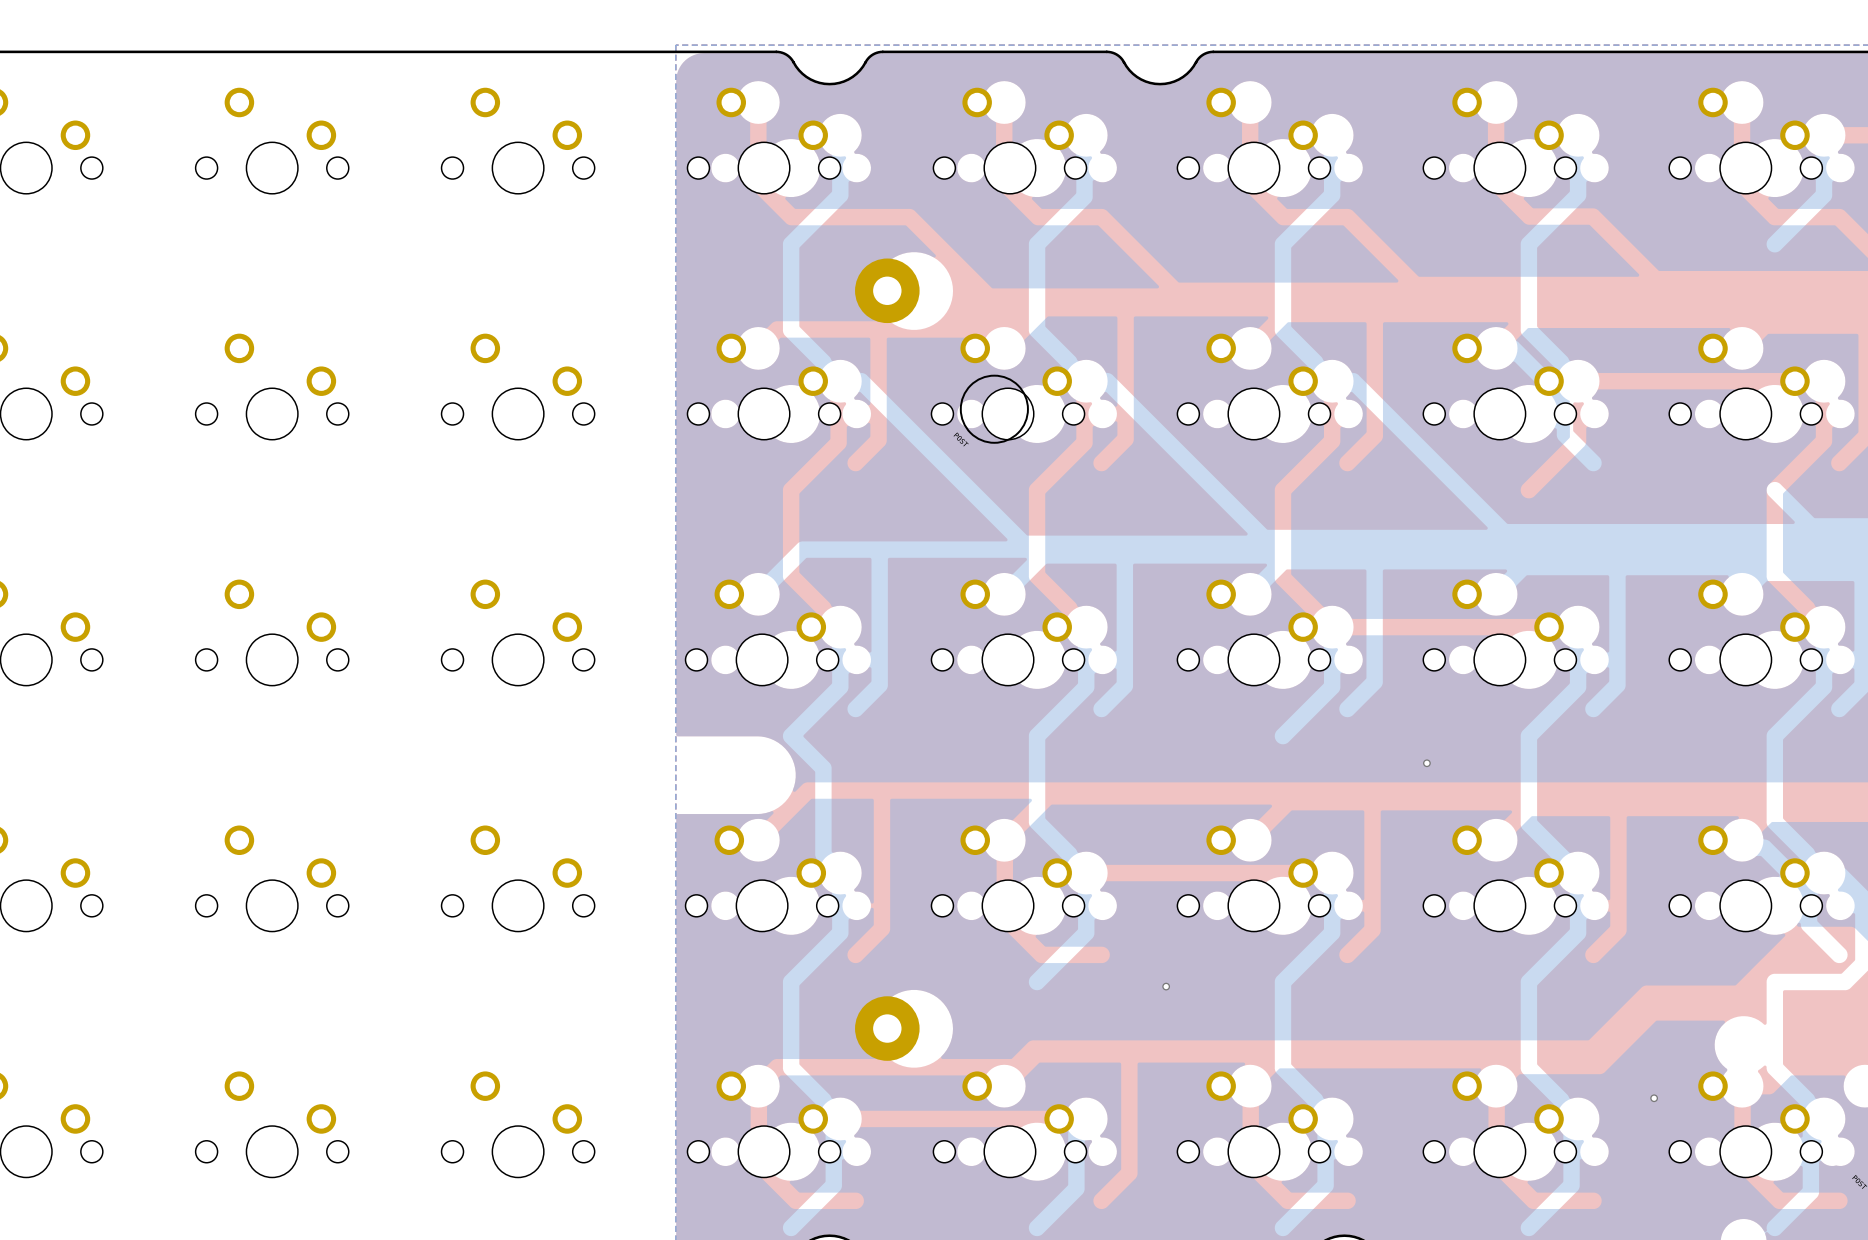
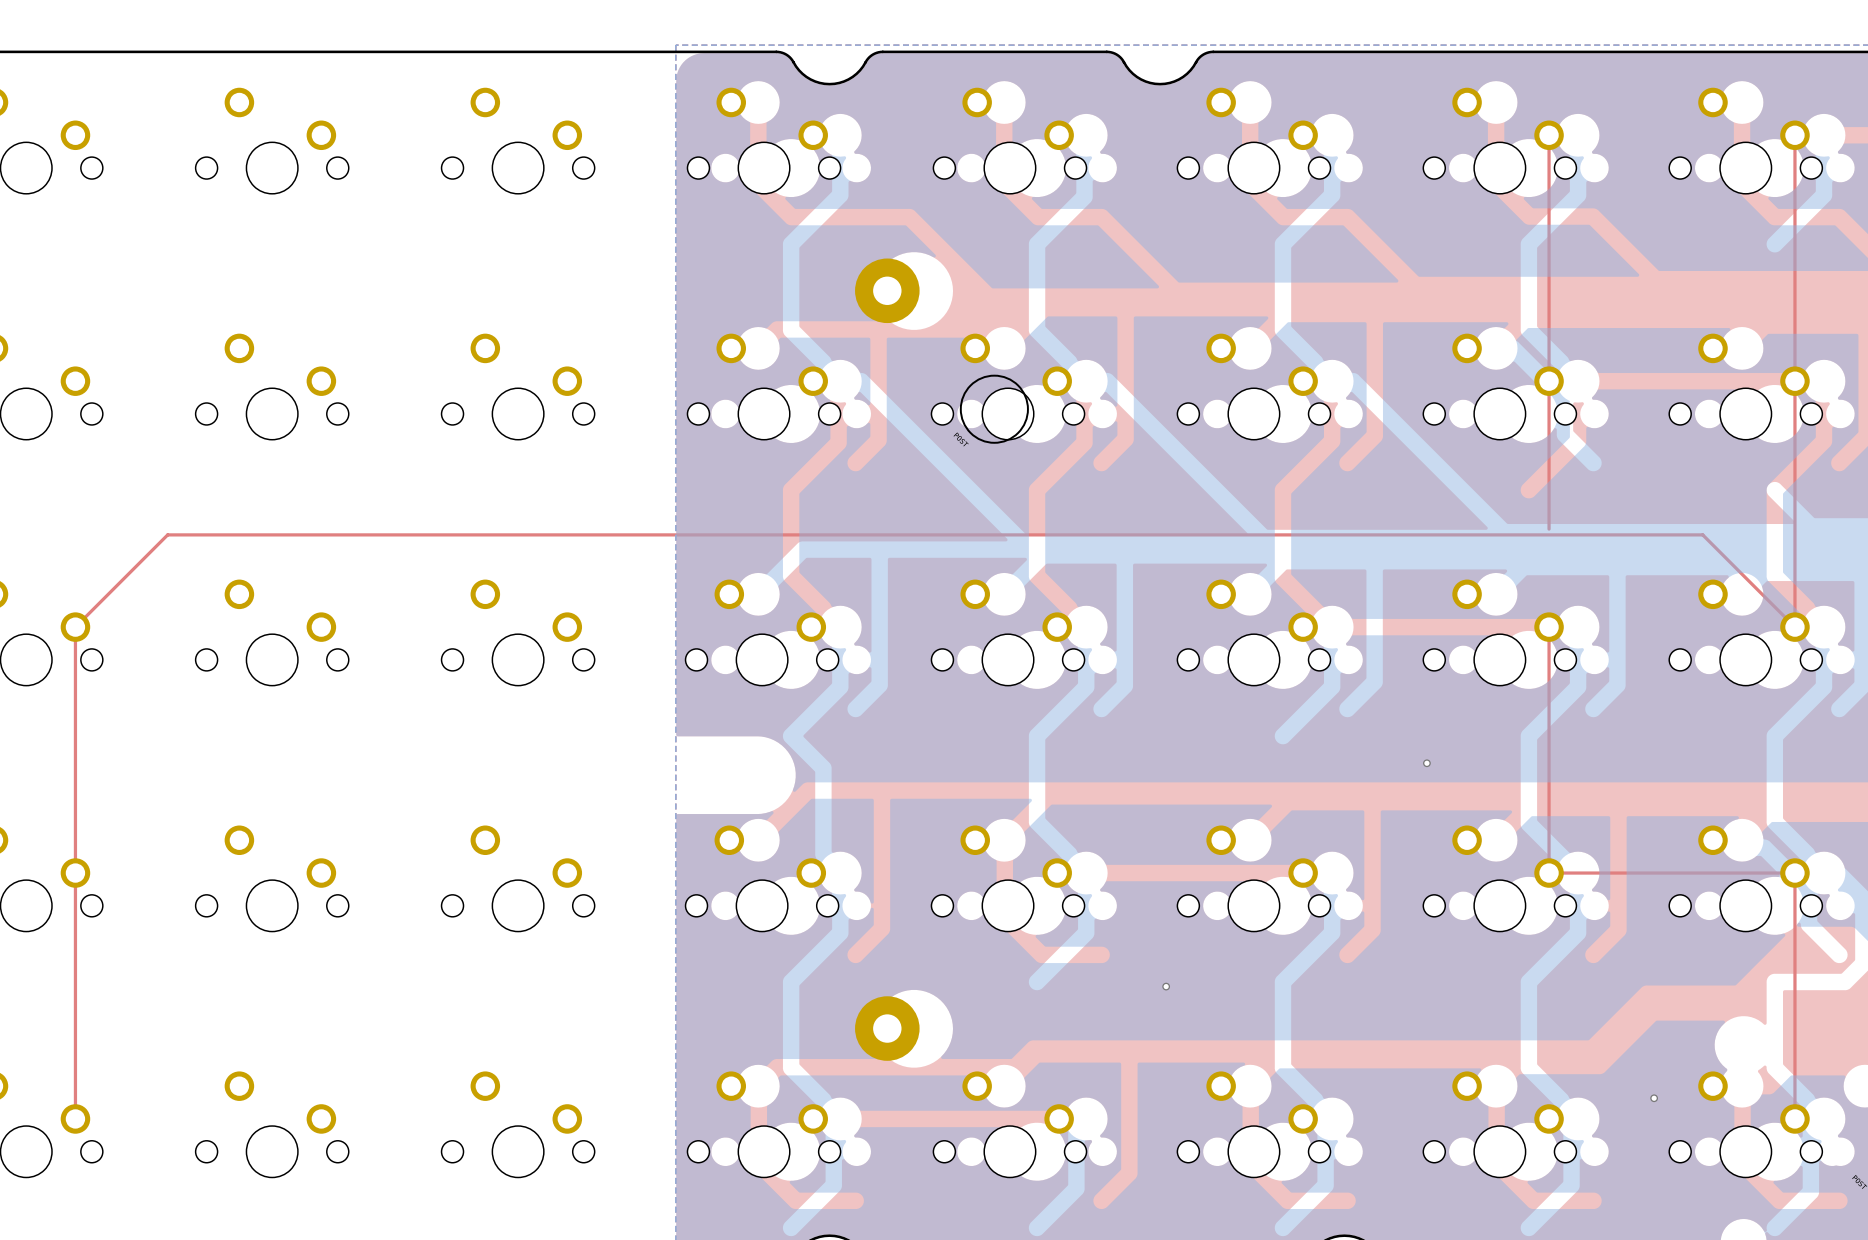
top track: none -> (1549, 135) (1549, 529)
top track: none -> (1794, 135) (1794, 627) (1702, 534) (167, 534) (75, 627) (75, 1118)
top track: none -> (1549, 627) (1549, 873) (1794, 873) (1794, 1118)

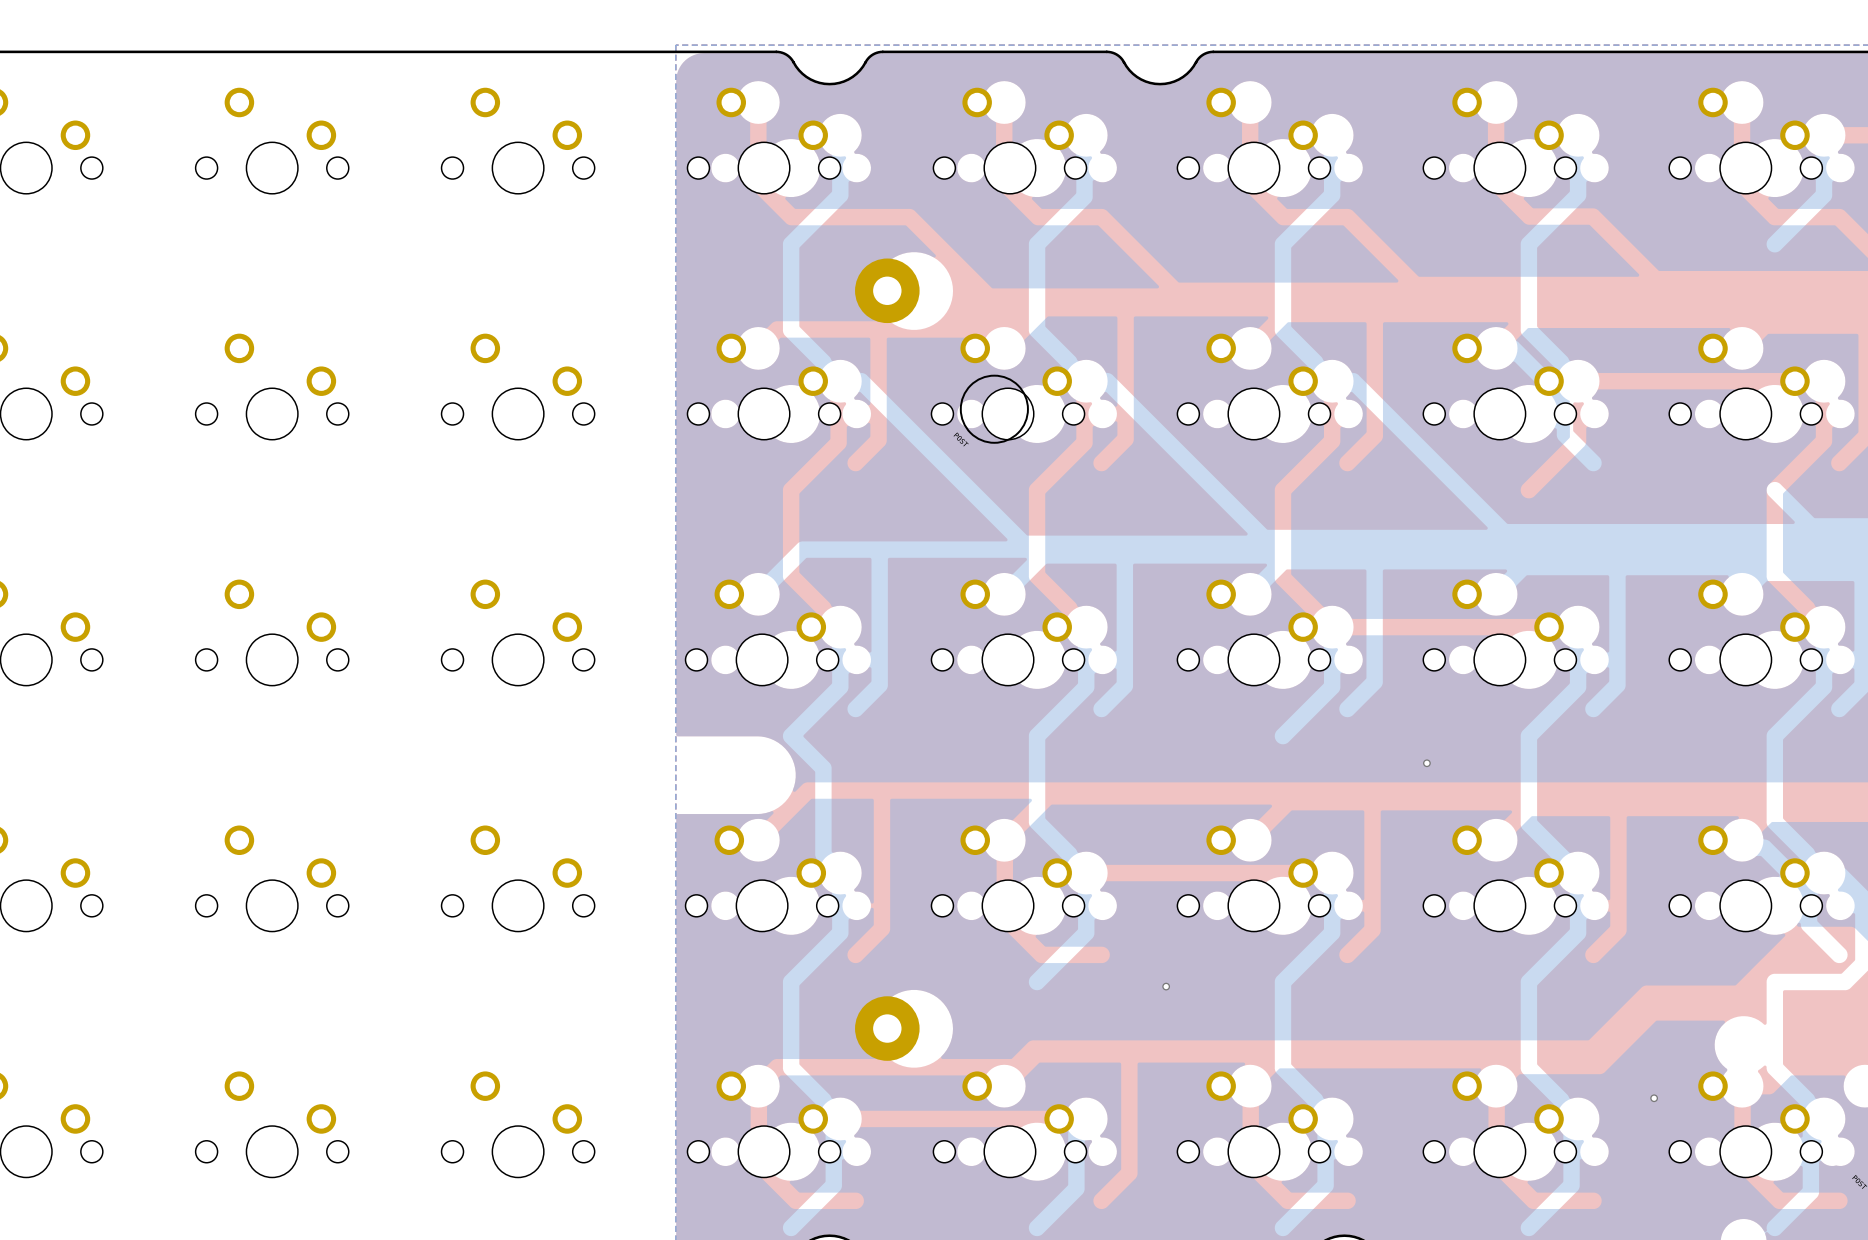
top track: (1549, 135) (1549, 529) -> none
top track: (1794, 135) (1794, 627) (1702, 534) (167, 534) (75, 627) (75, 1118) -> none
top track: (1549, 627) (1549, 873) (1794, 873) (1794, 1118) -> none

